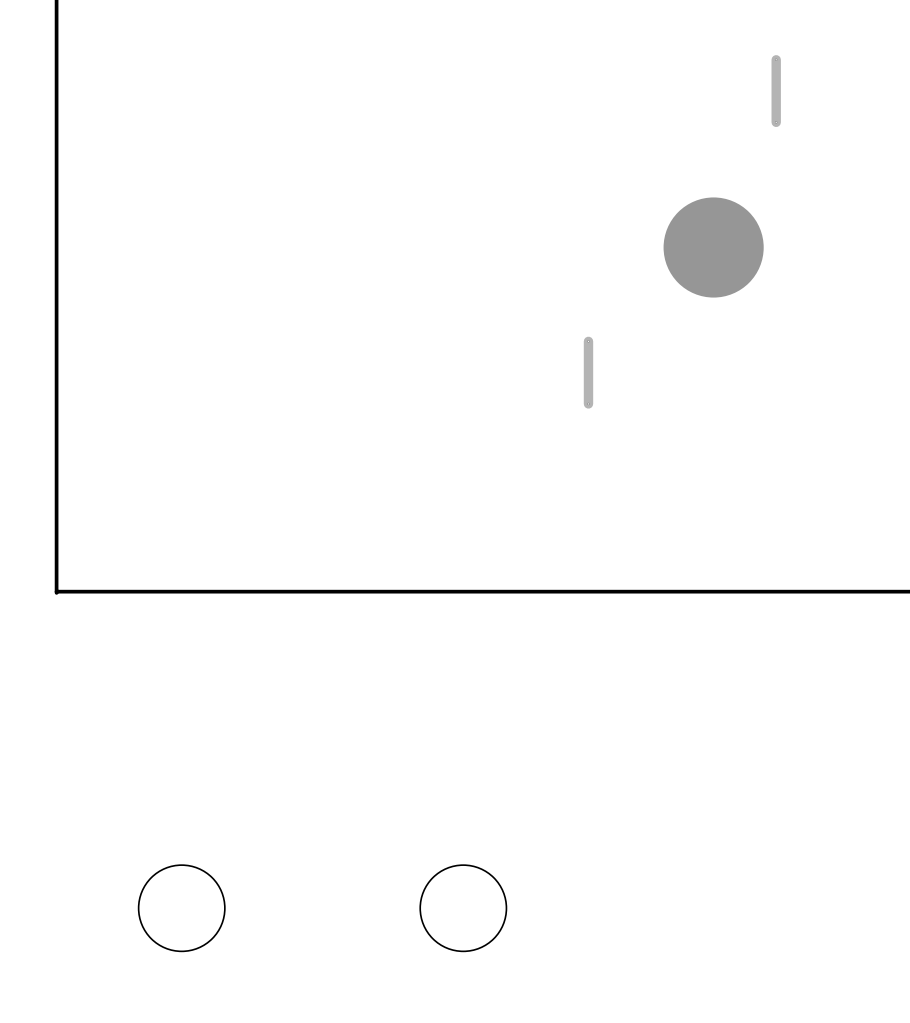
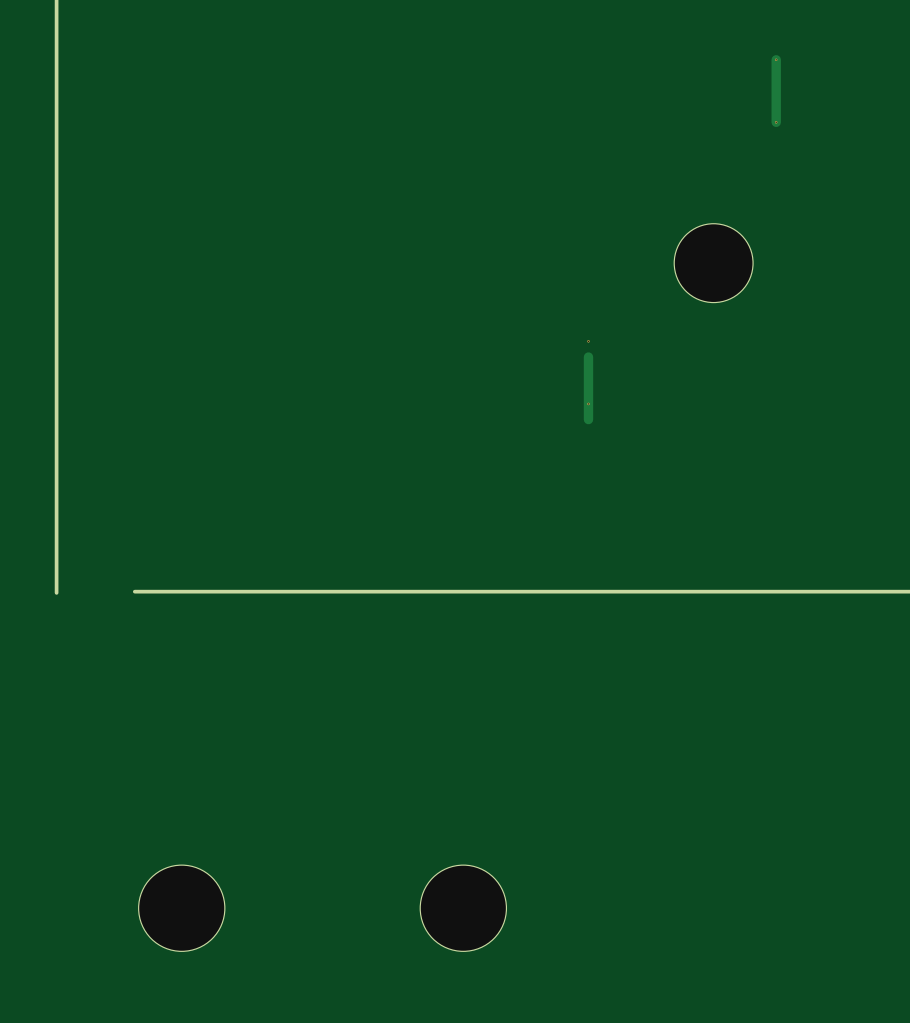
part footprint: [663, 197, 764, 298] -> [674, 223, 754, 303]
track: (588, 341) (588, 357) -> (588, 403) (588, 419)
board edge: (134, 591) (56, 591) -> none

